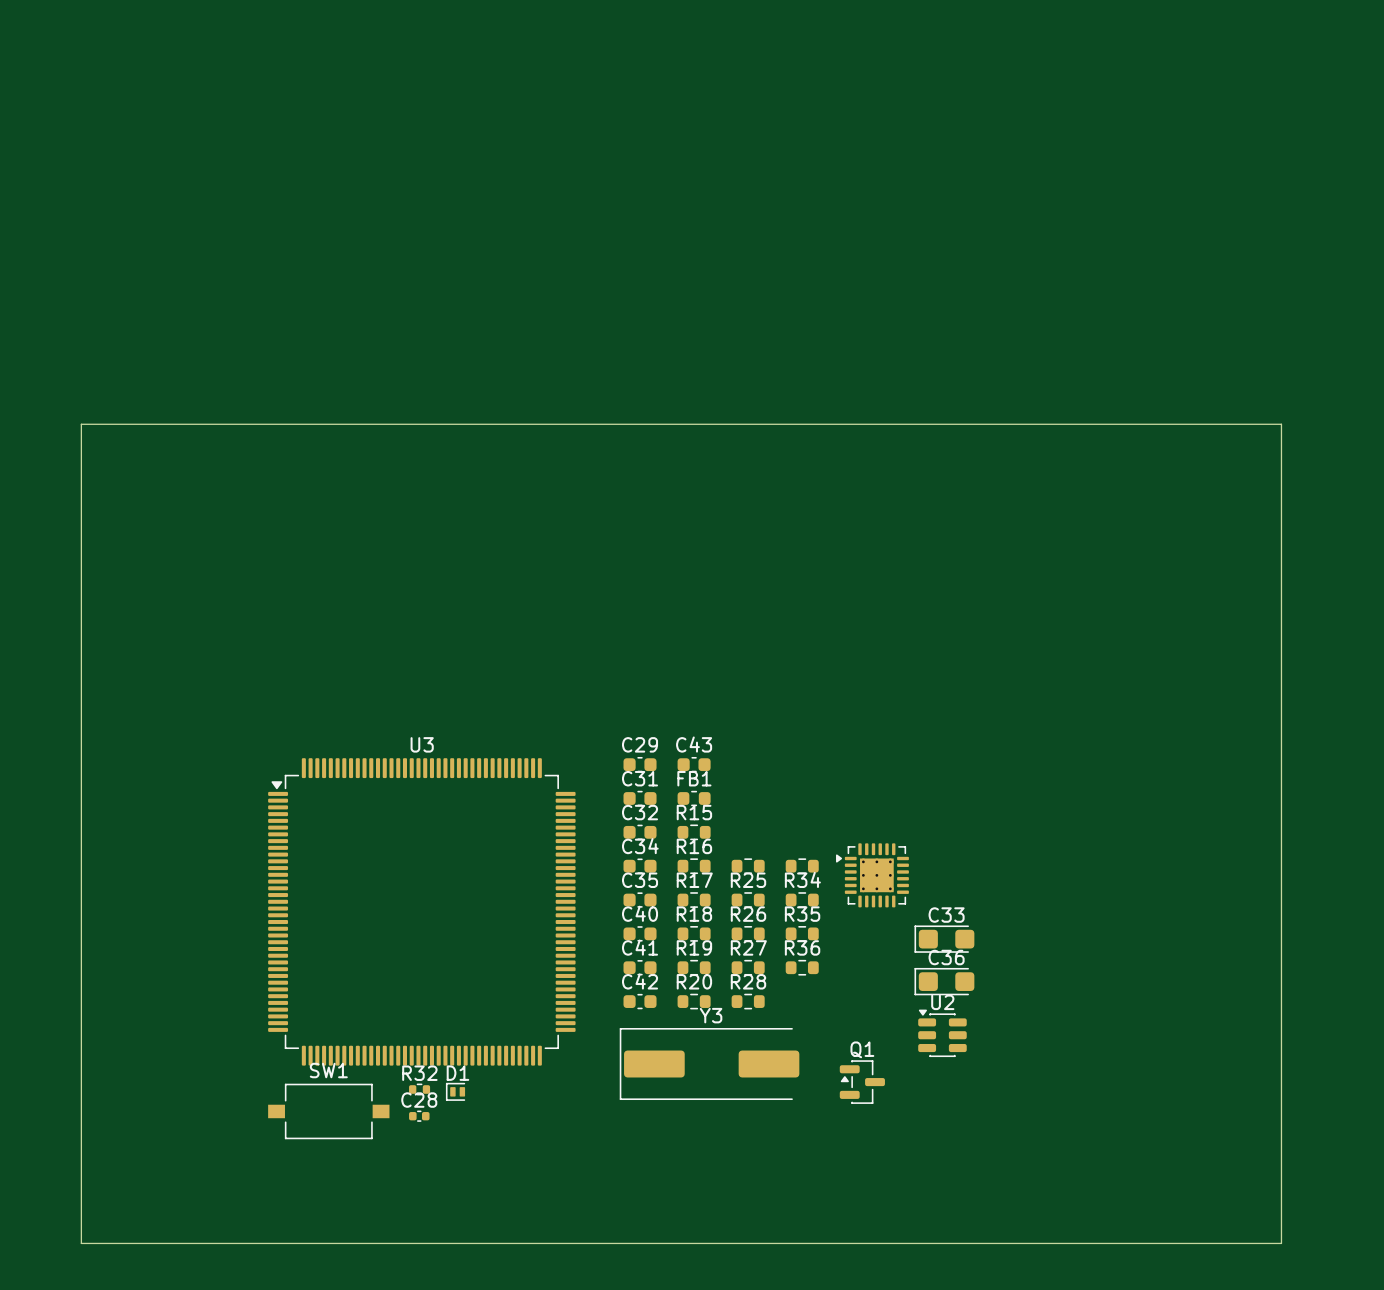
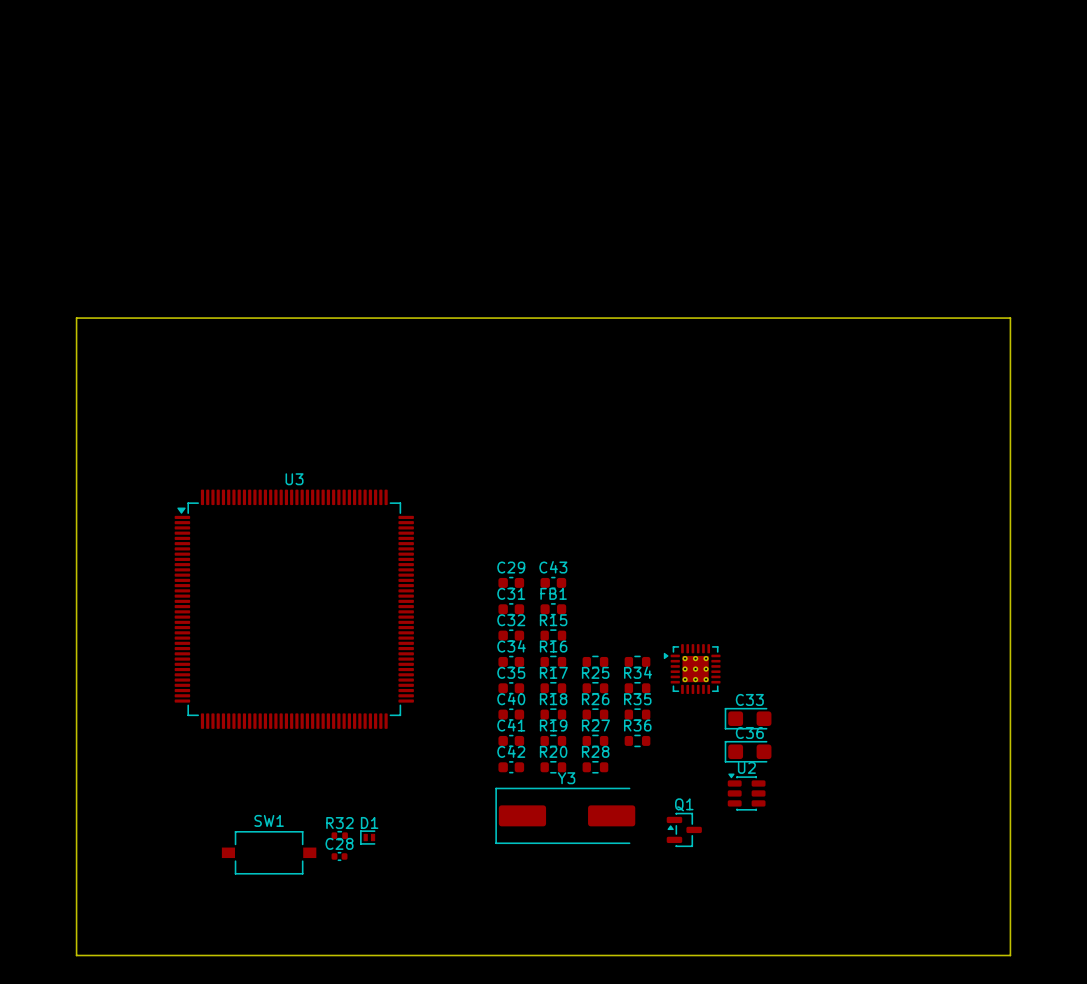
U3 position: (421, 911) -> (294, 609)

